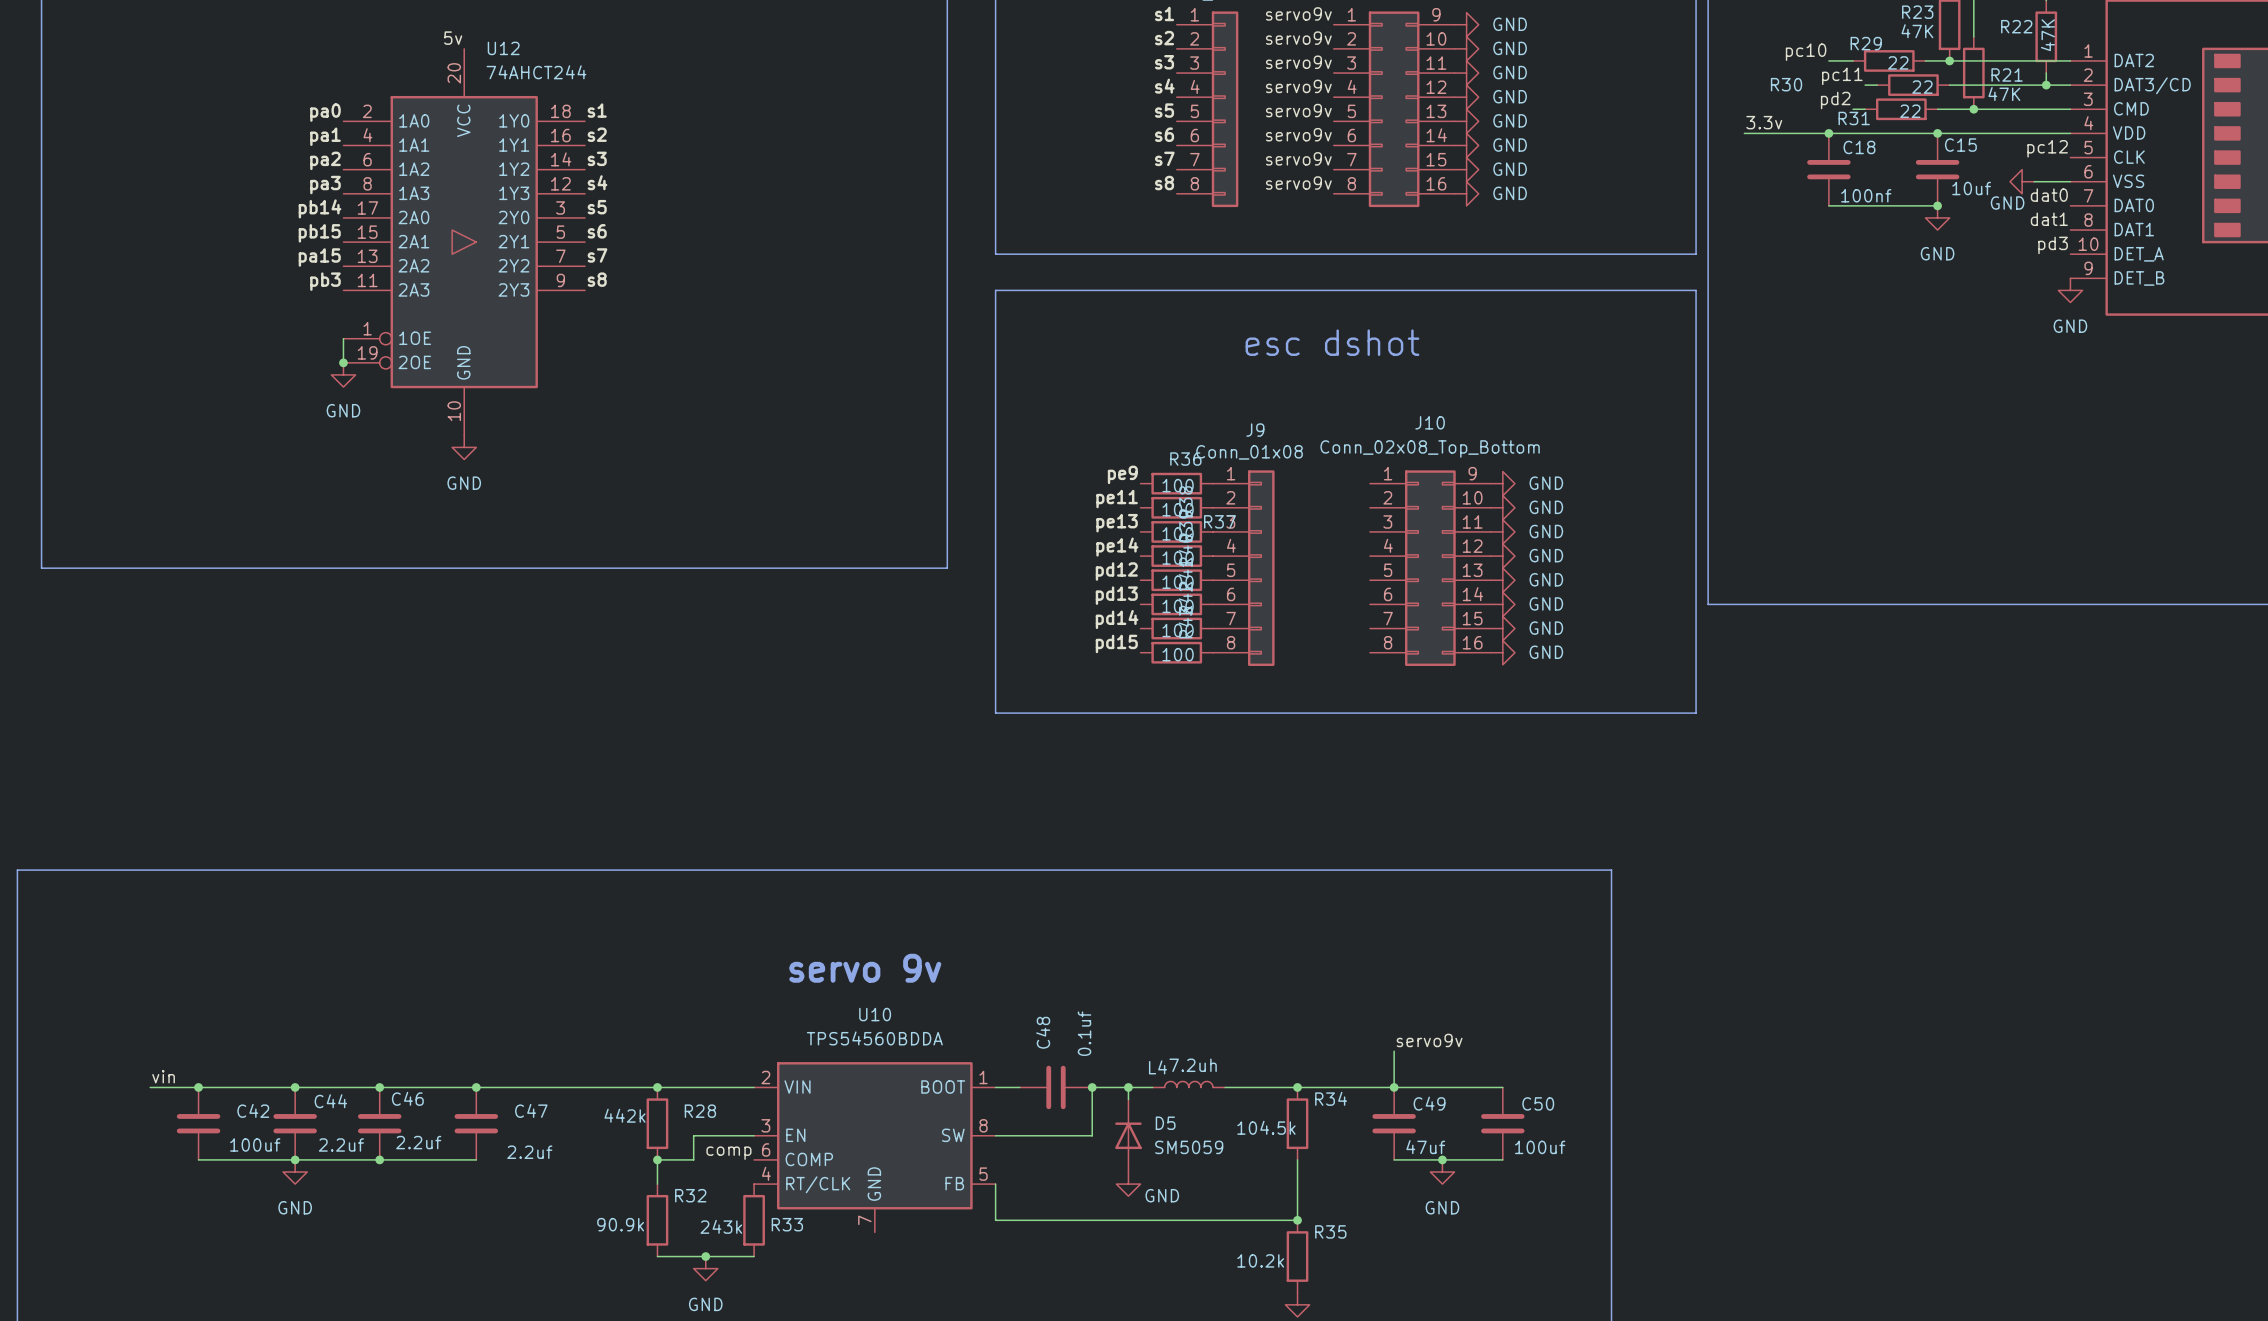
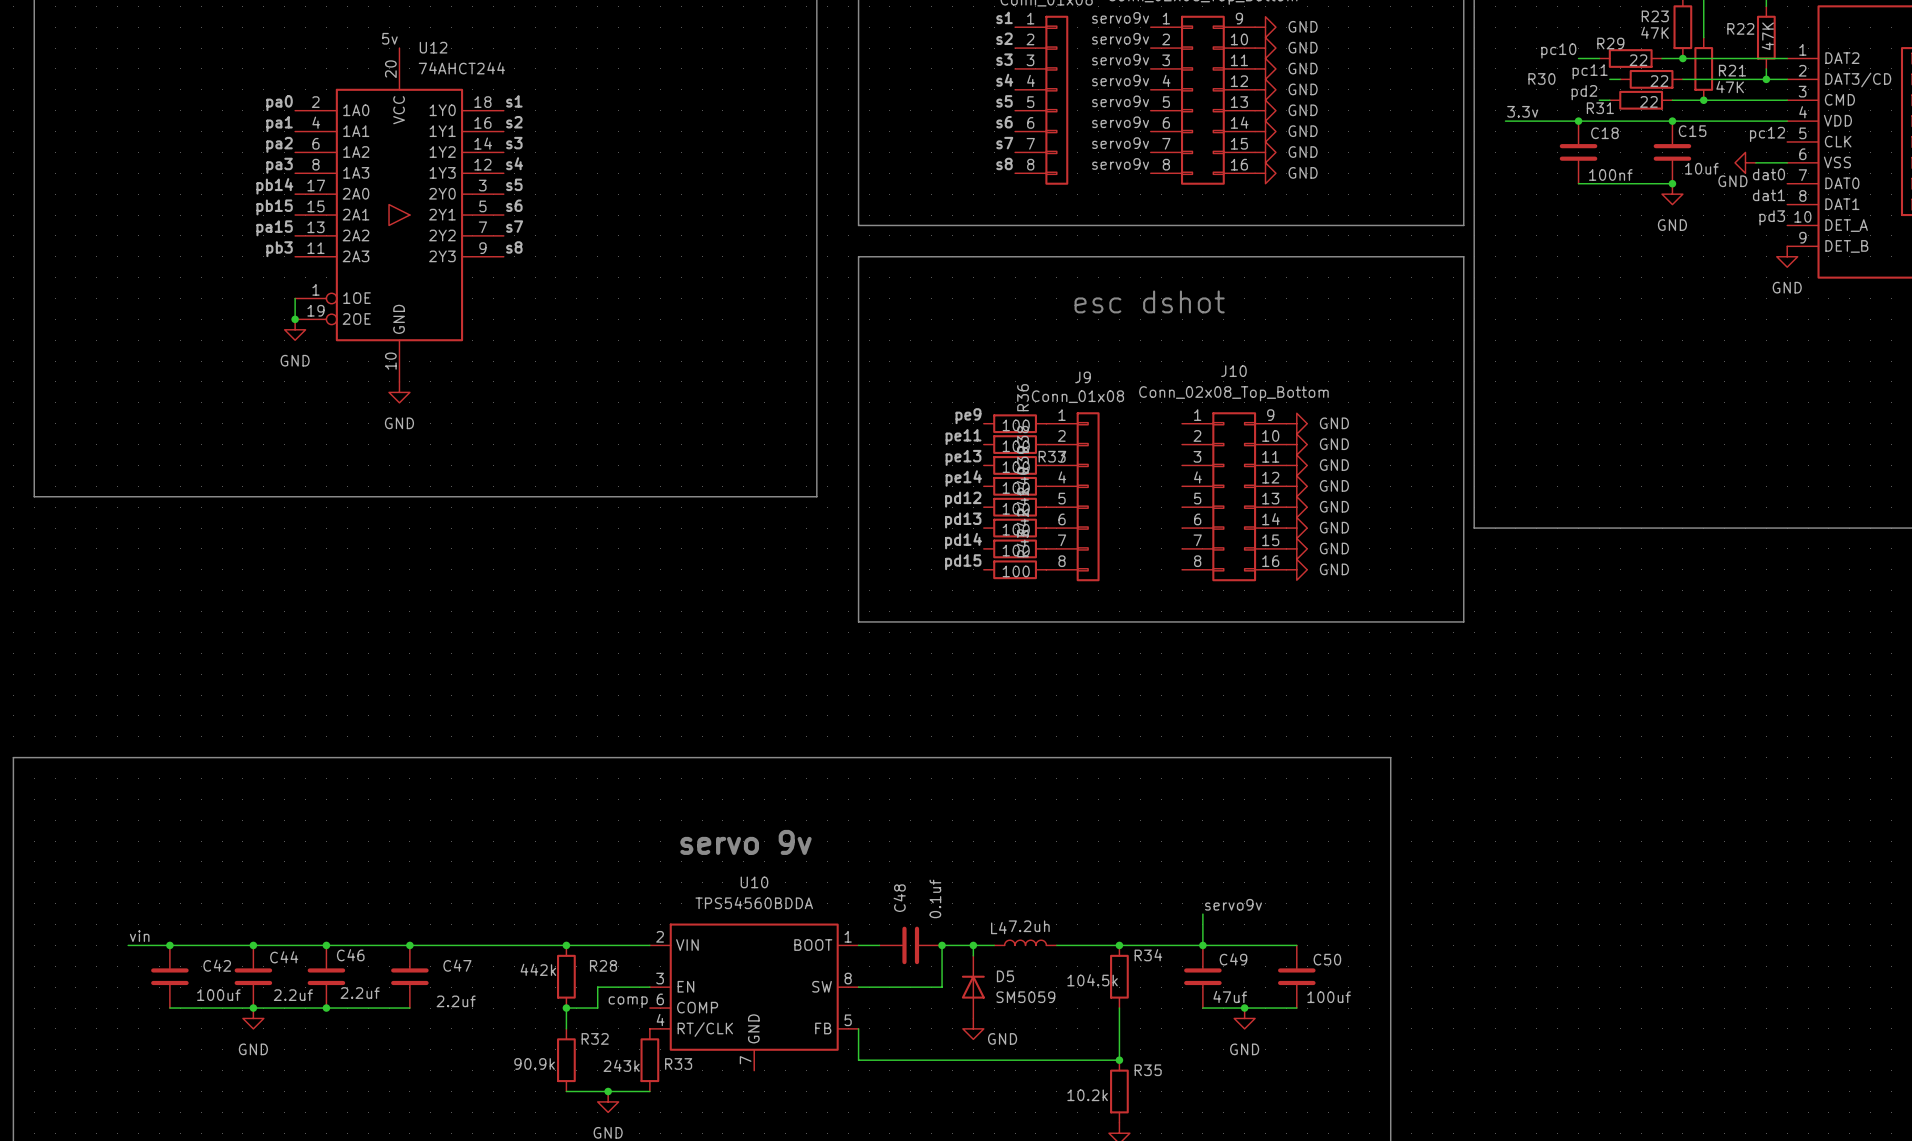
R36 name rotation: 0° (1185, 459) -> 90° counterclockwise (1023, 397)

